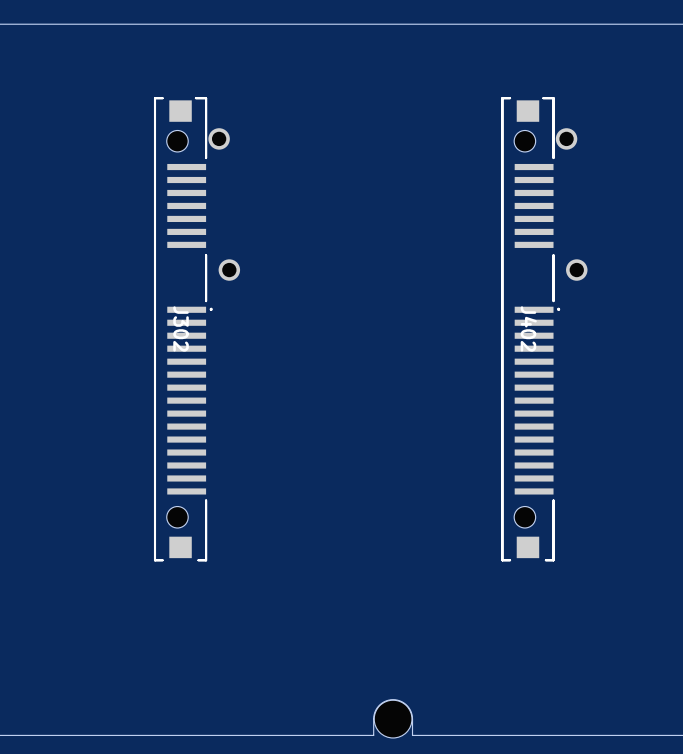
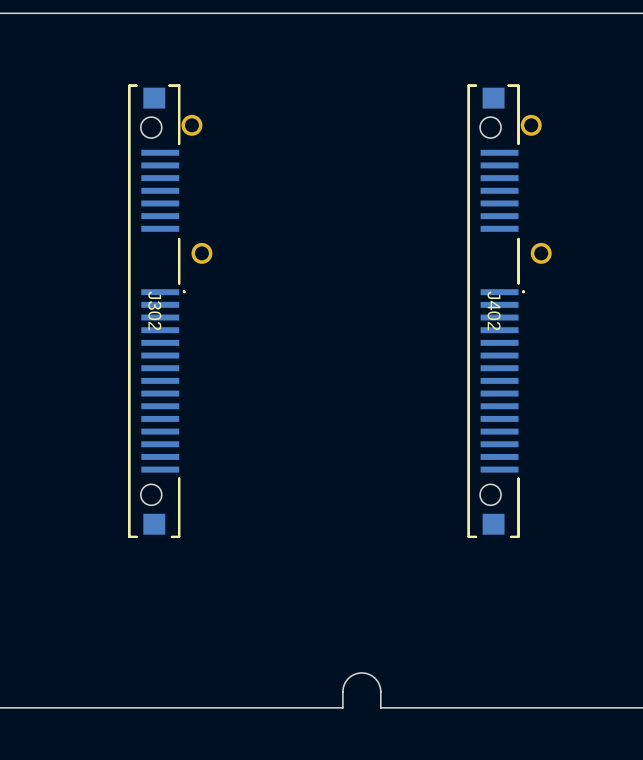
part: (393, 719) -> none

